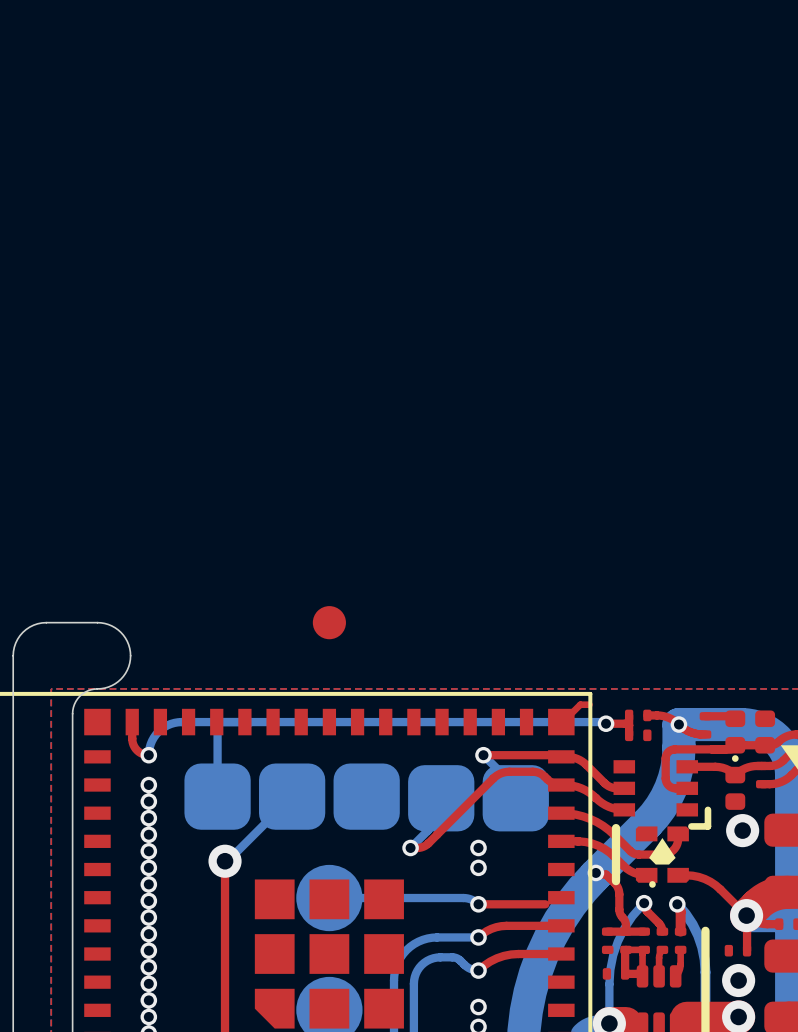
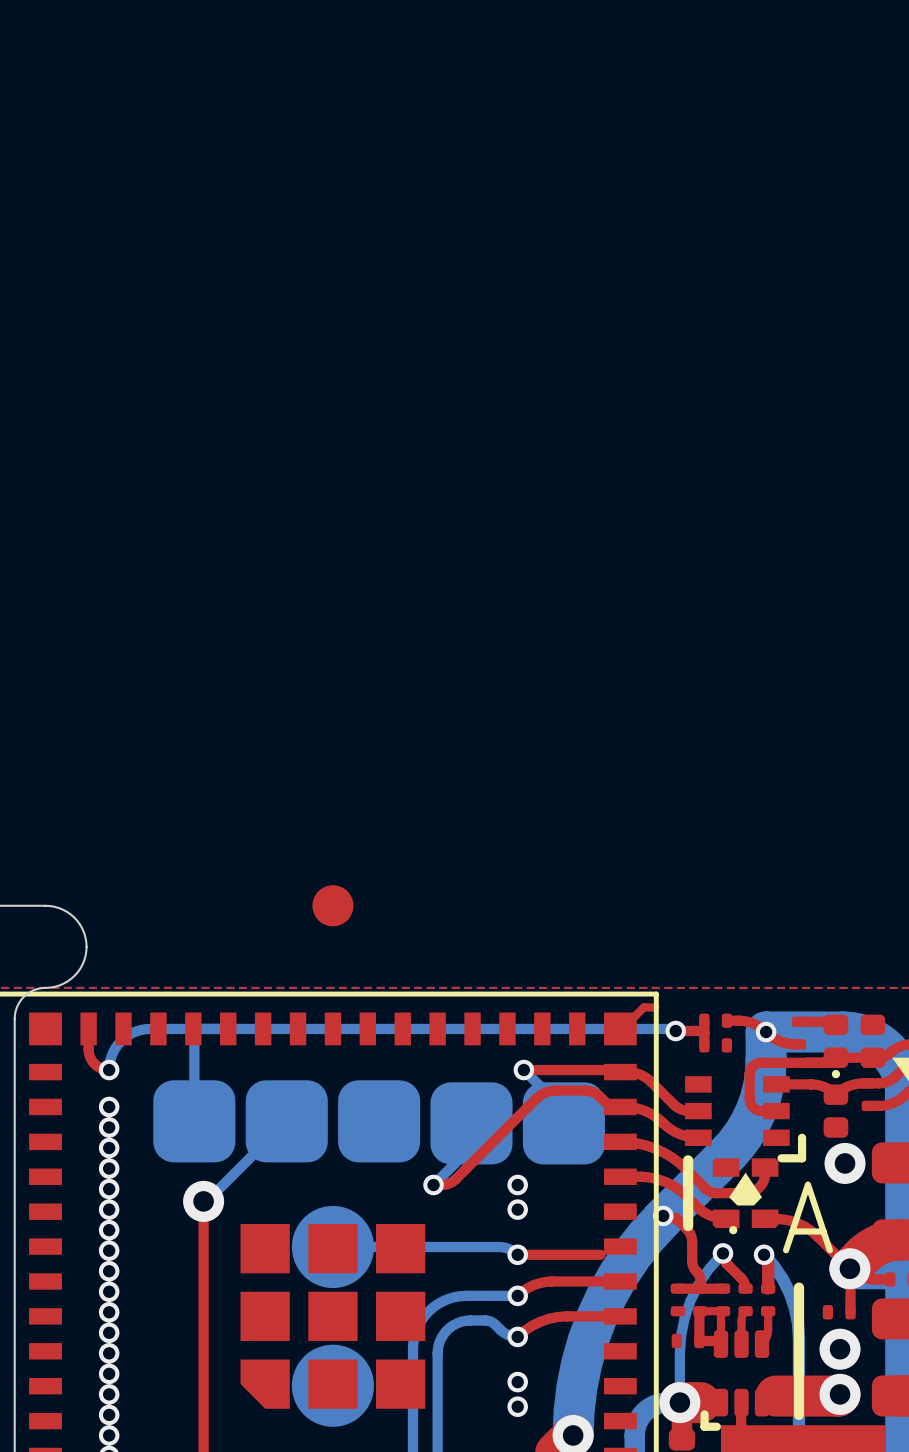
text: none -> A (807, 1217)

